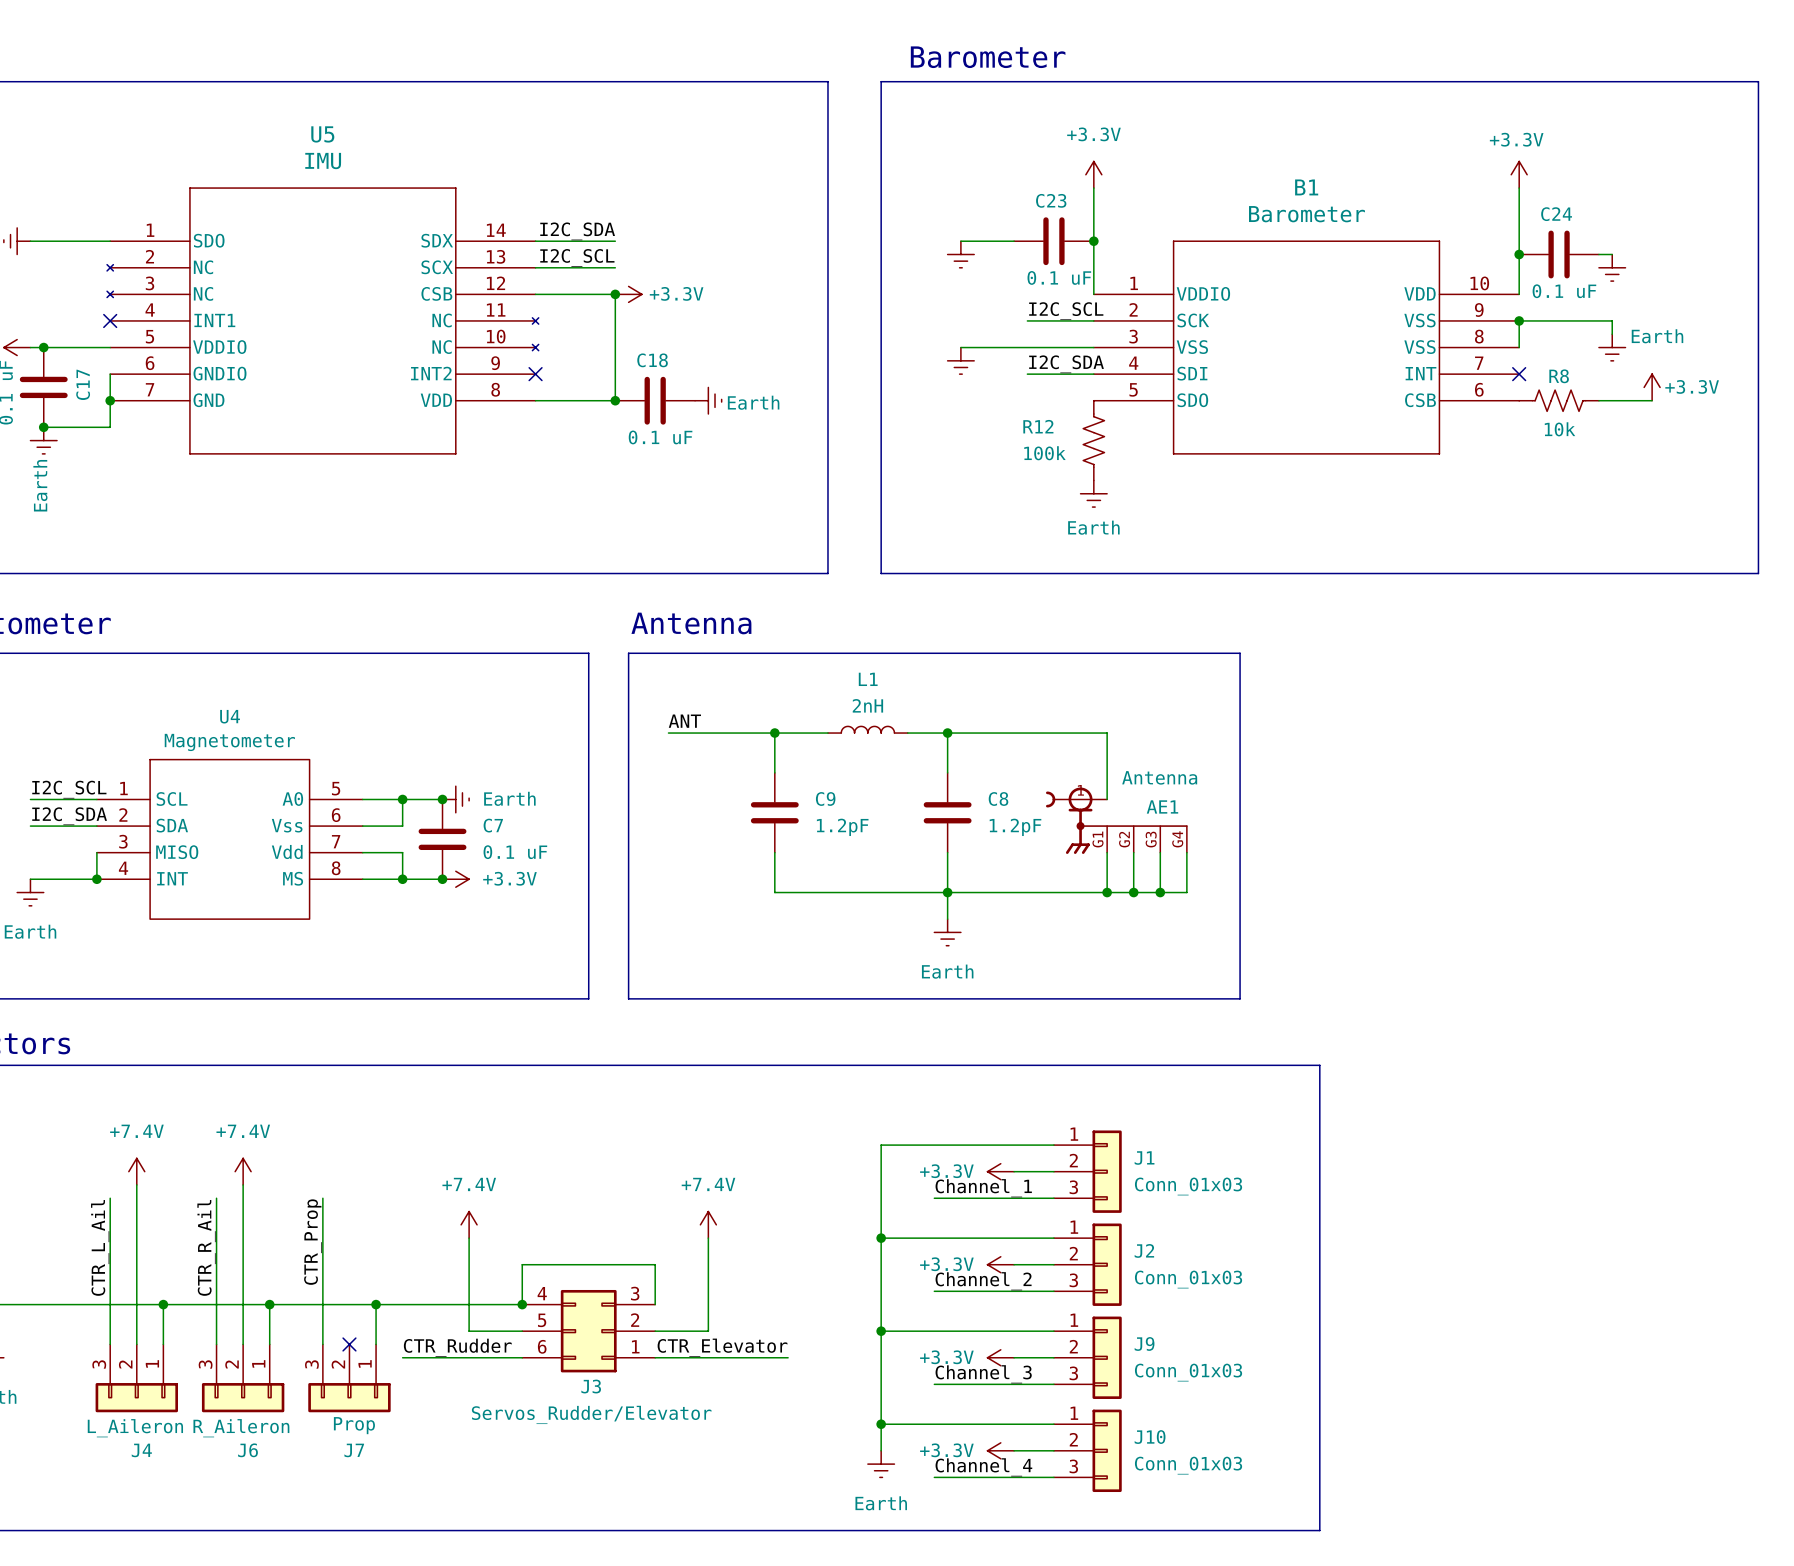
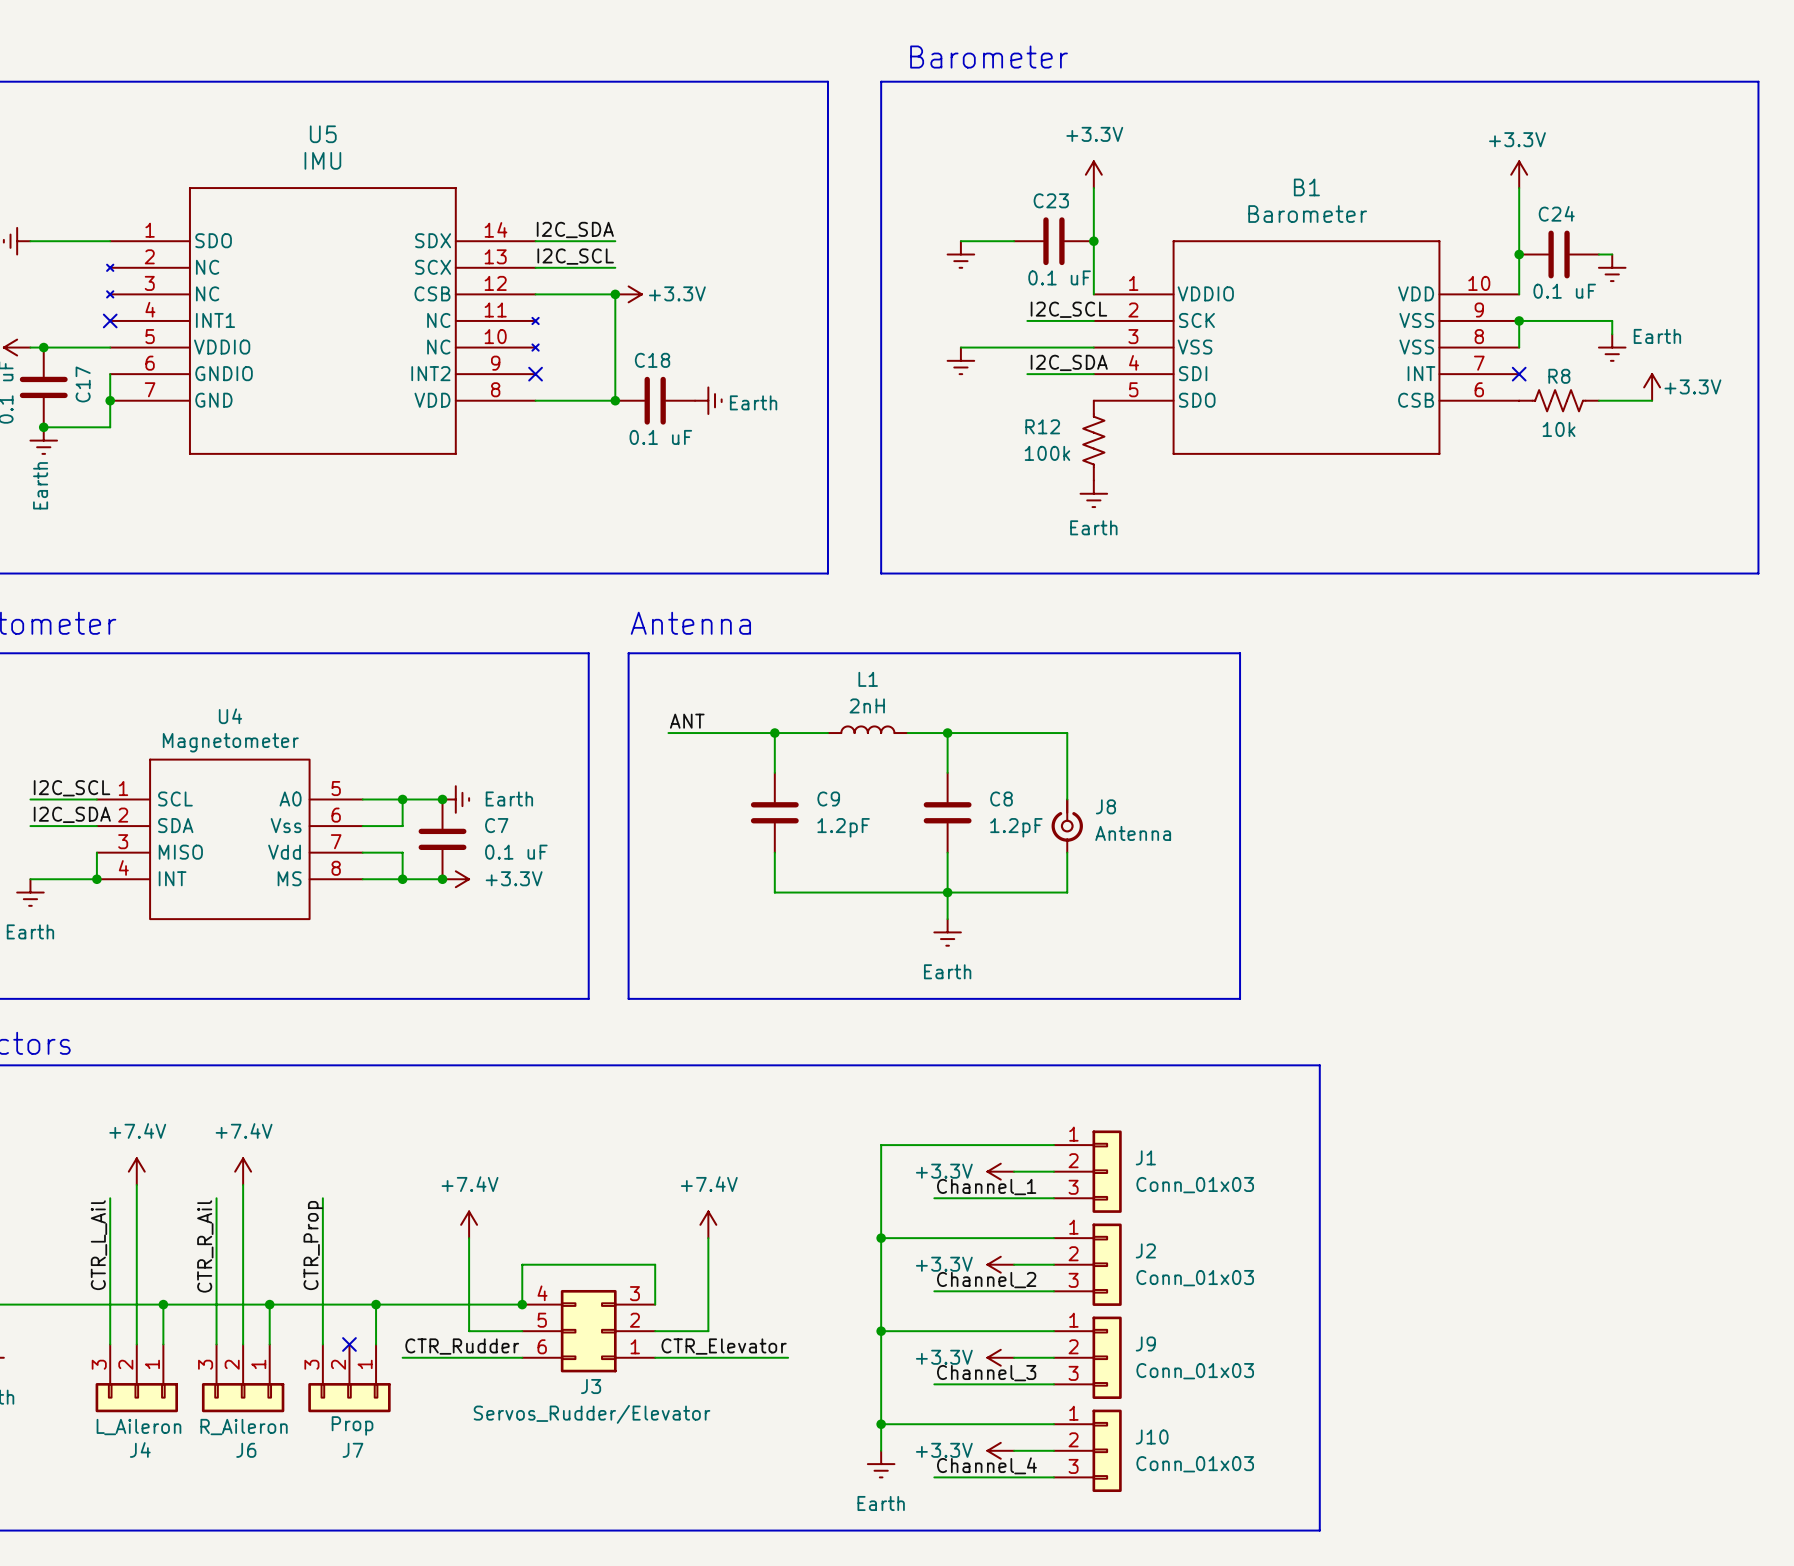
wire: (1067, 733) (1107, 733) (1107, 799) -> (1067, 733) (1067, 799)
AE1: Antenna (1116, 820) -> none
J8: none -> Antenna (1067, 826)
wire: (1107, 852) (1107, 892) -> none
wire: (1133, 852) (1133, 892) -> none
wire: (1160, 852) (1160, 892) -> none
wire: (1186, 852) (1186, 892) (1067, 892) -> (1067, 852) (1067, 892)
junction: (1107, 892) -> none
junction: (1133, 892) -> none
junction: (1160, 892) -> none

